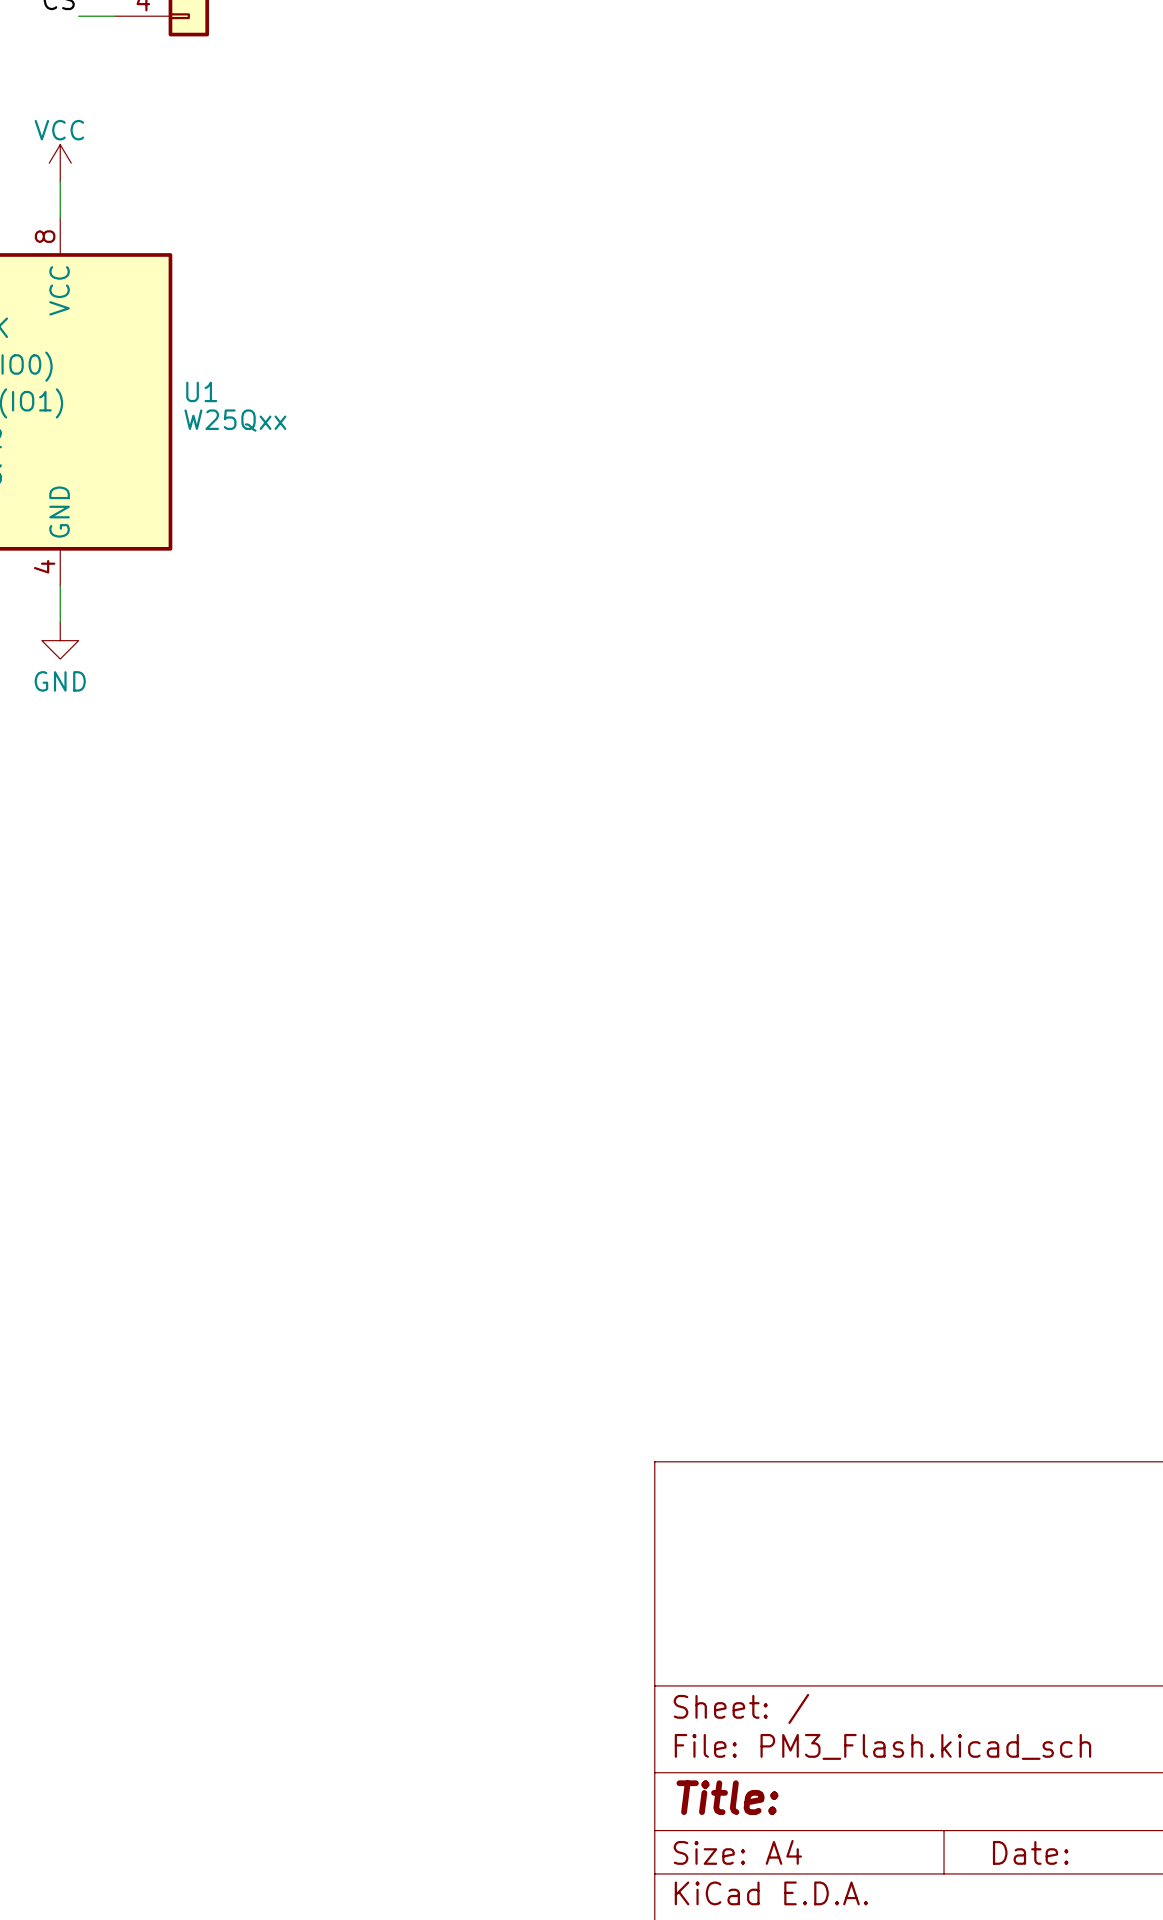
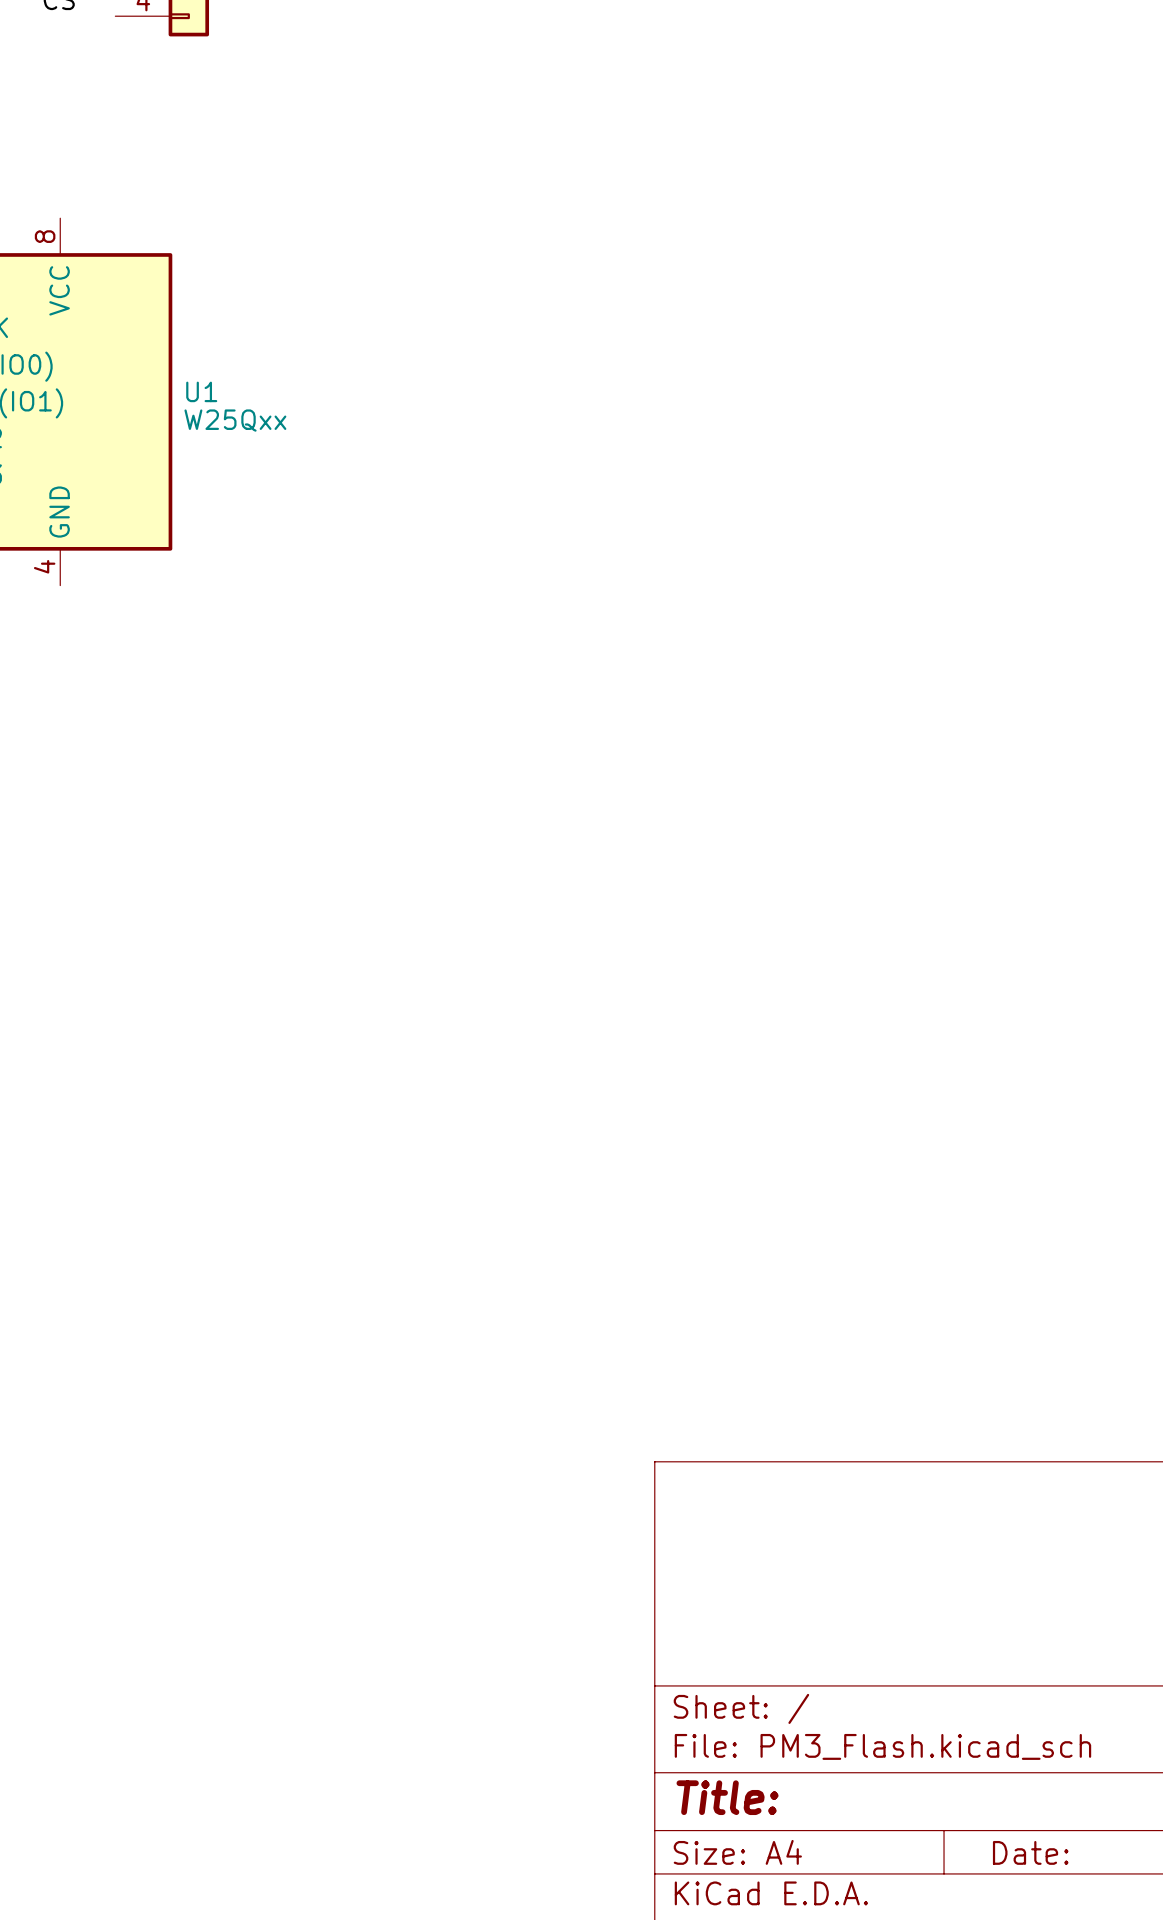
wire: (78, 16) (115, 16) -> none
power symbol: VCC (60, 163) -> none
wire: (60, 181) (60, 218) -> none
wire: (60, 585) (60, 622) -> none
power symbol: GND (60, 640) -> none

